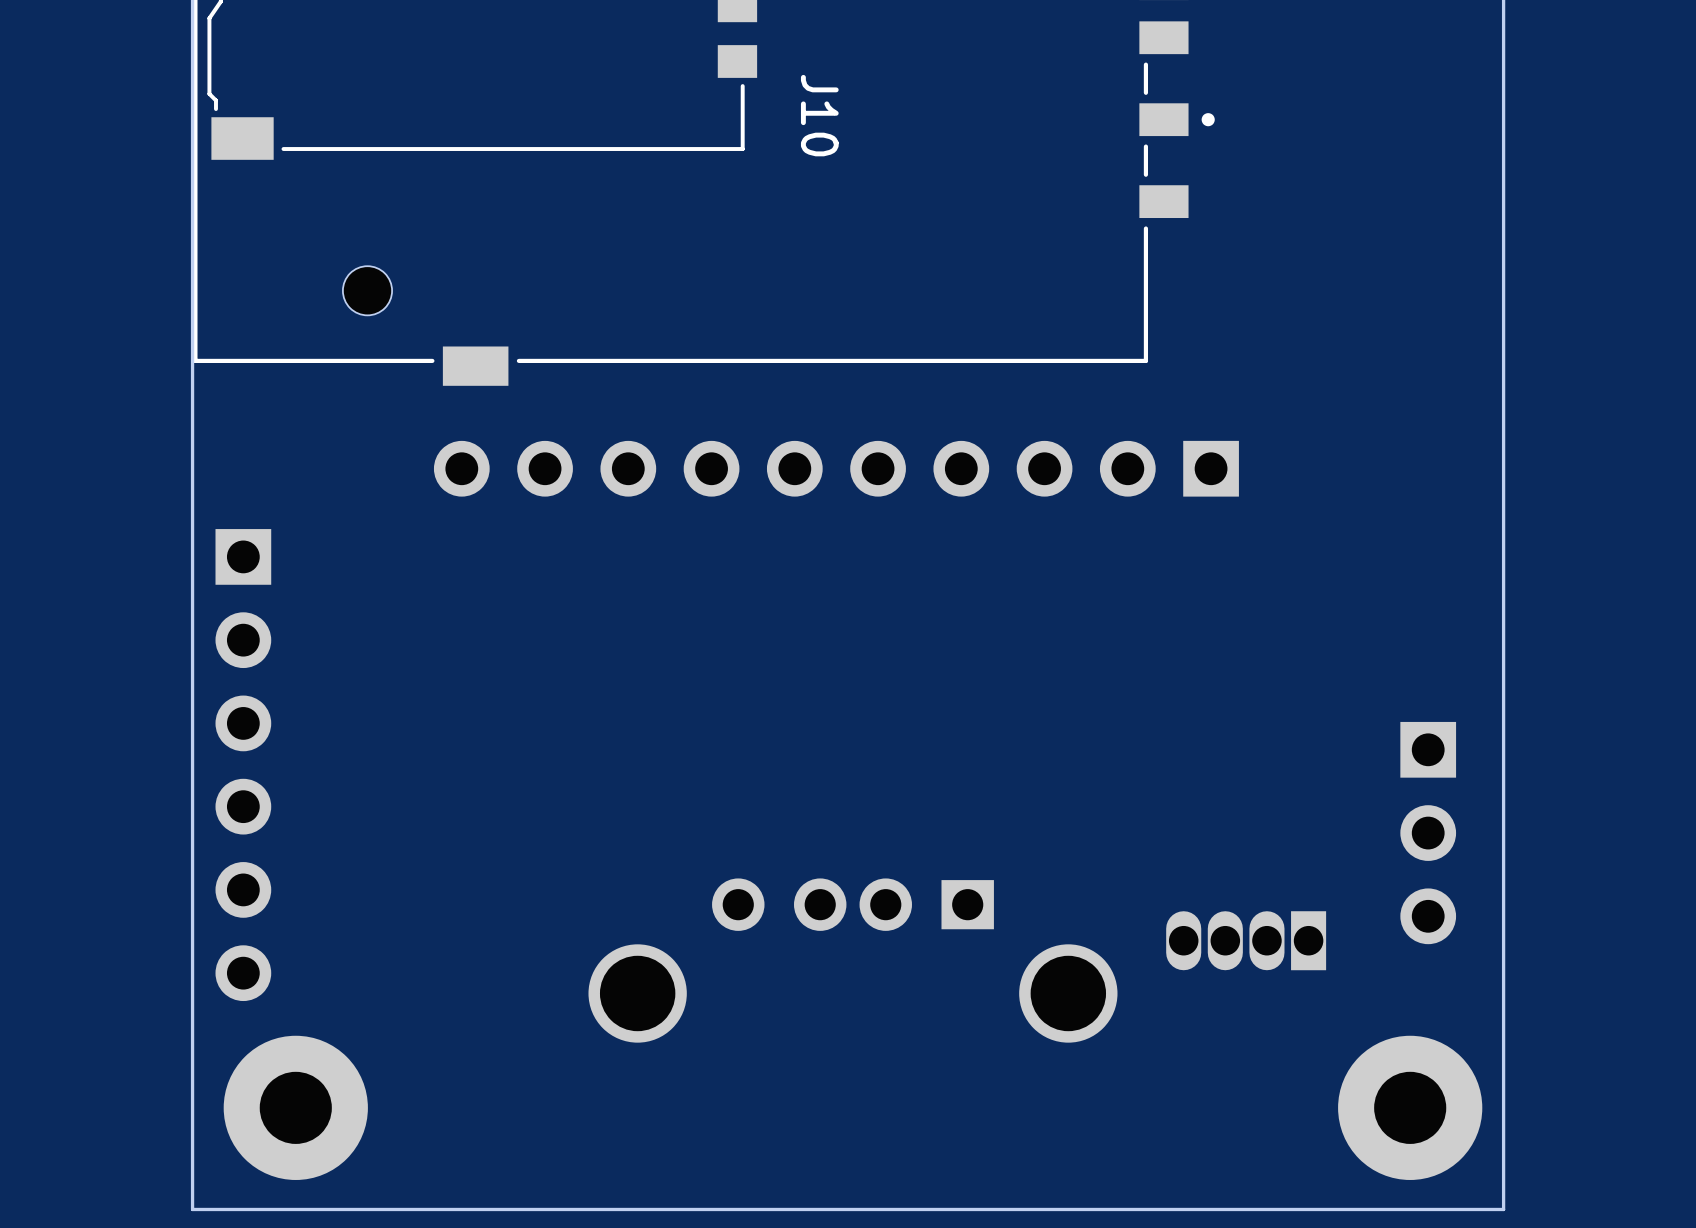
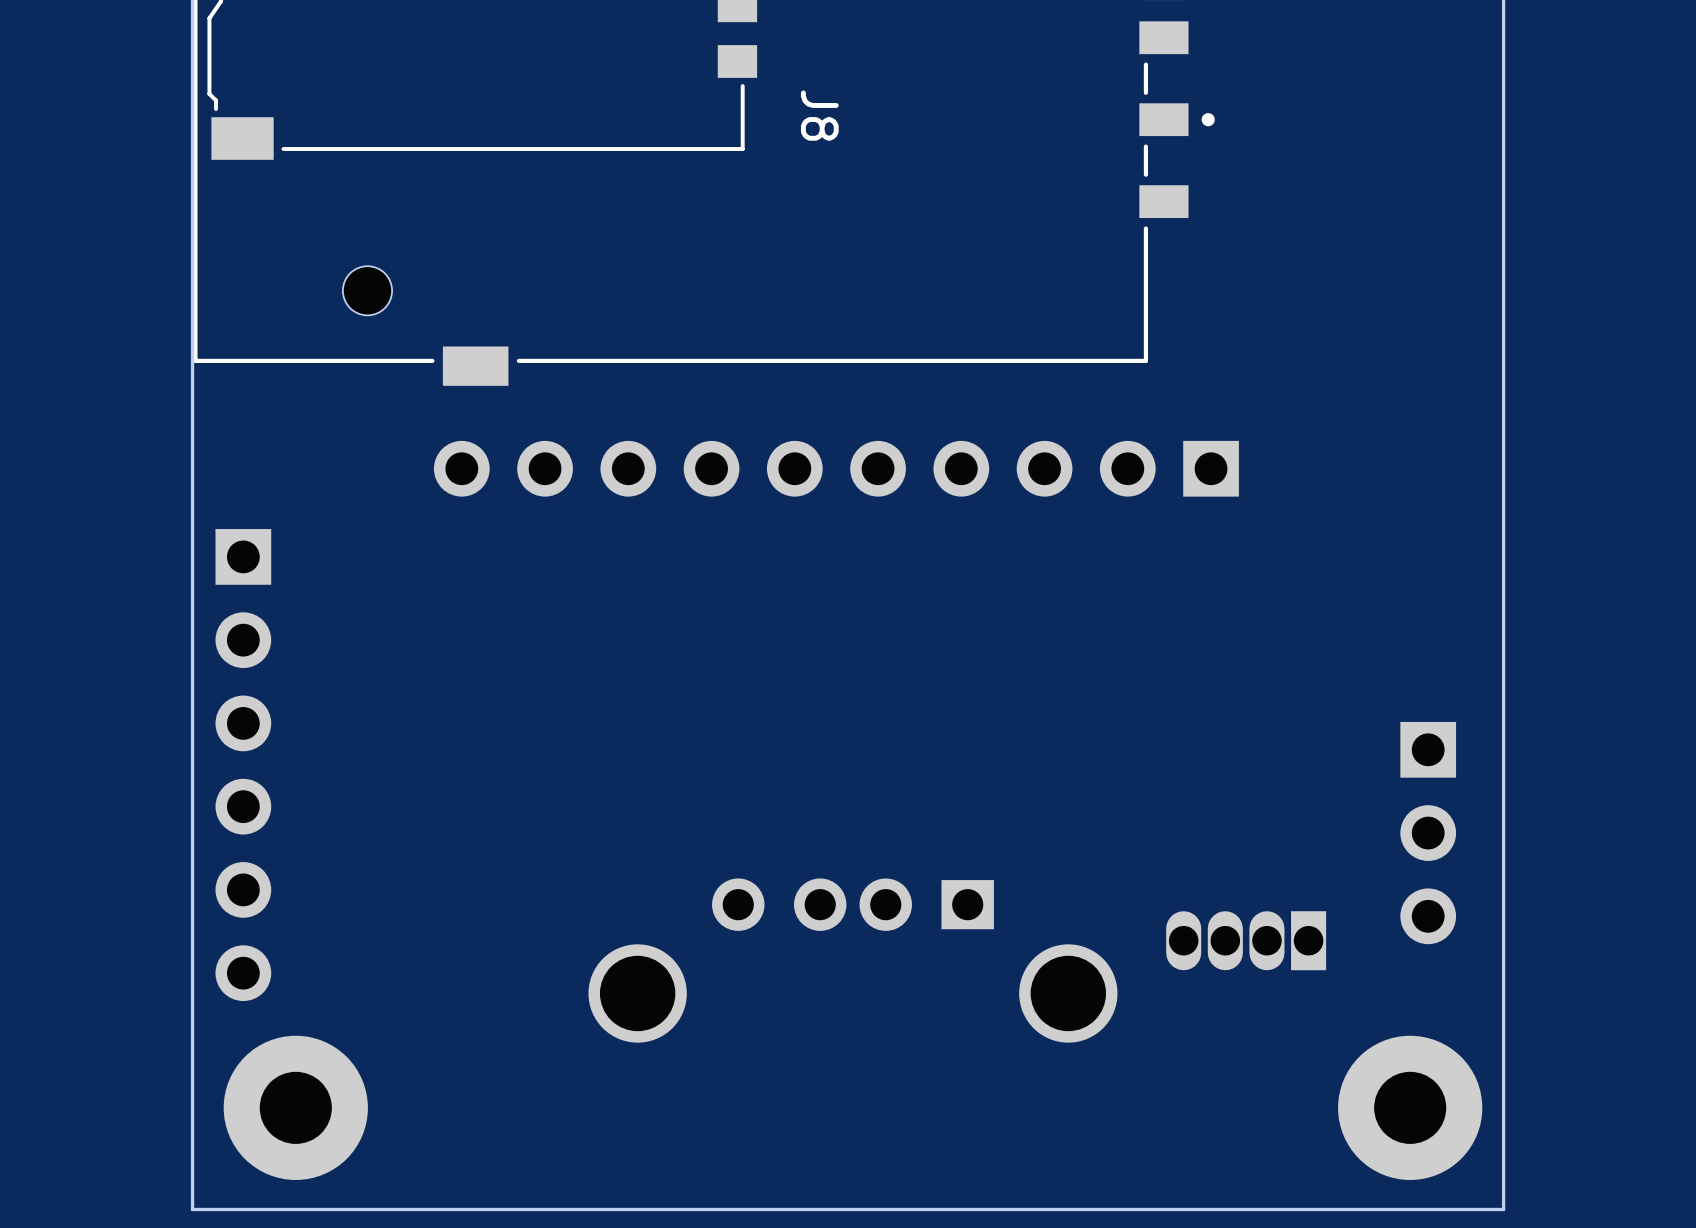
J10 name: J10 (819, 115) -> J8 (819, 115)

